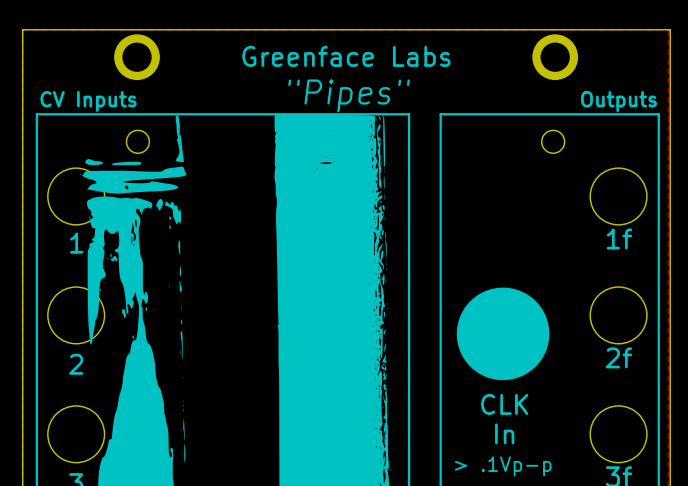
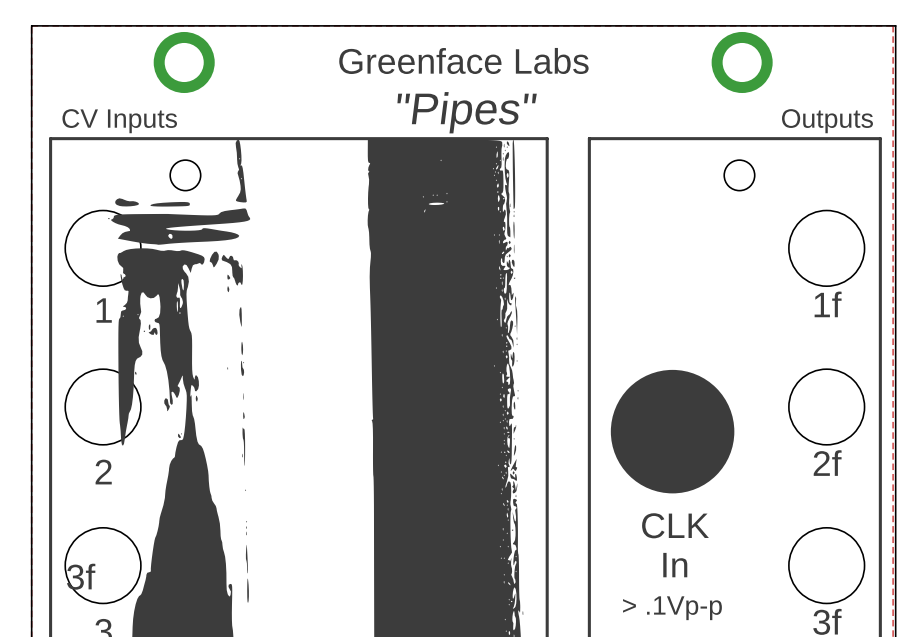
text: none -> 3f (81, 576)

